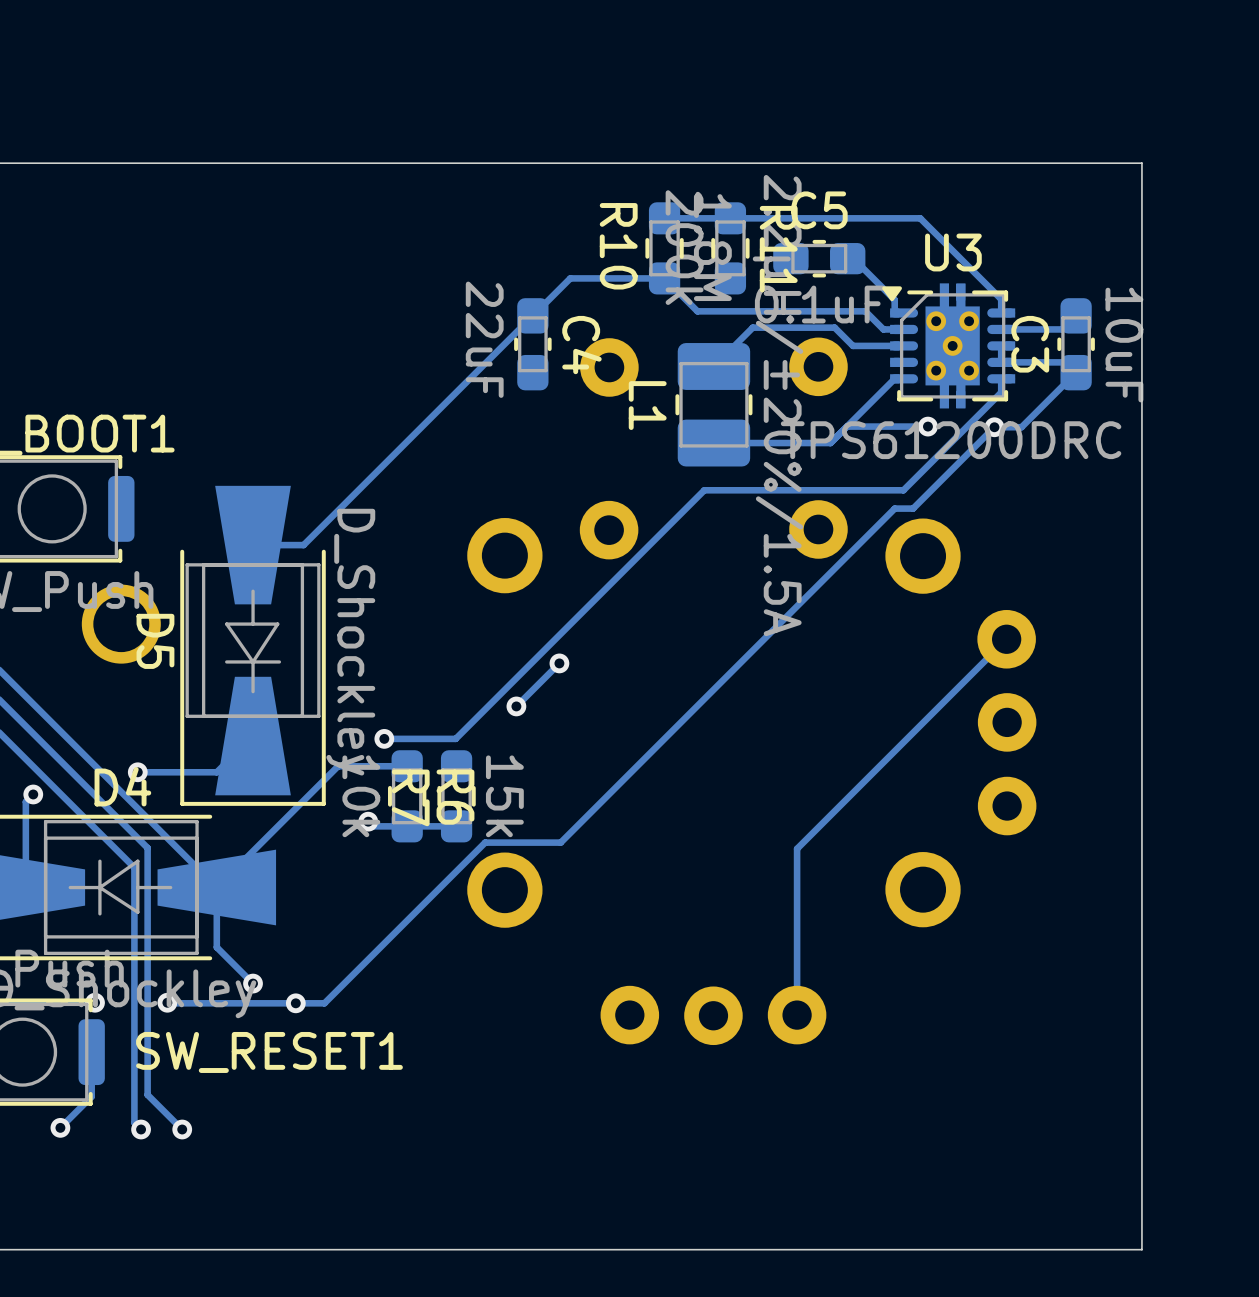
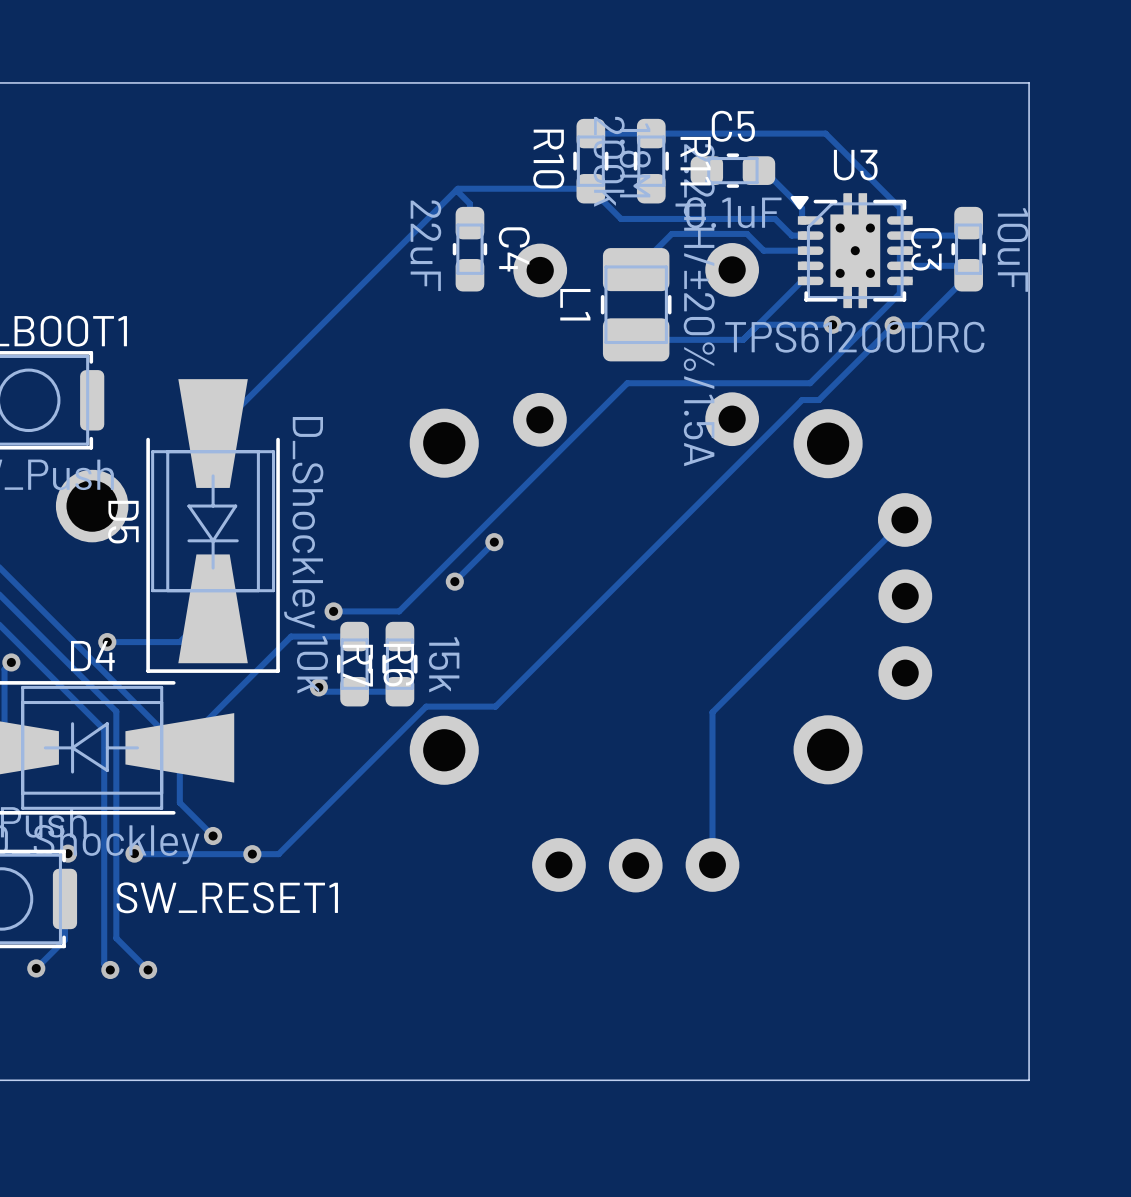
track: (570, 278) (303, 545) (253, 545) -> (504, 188) (457, 188) (213, 433)
track: none -> (456, 190) (469, 203) (469, 223)

